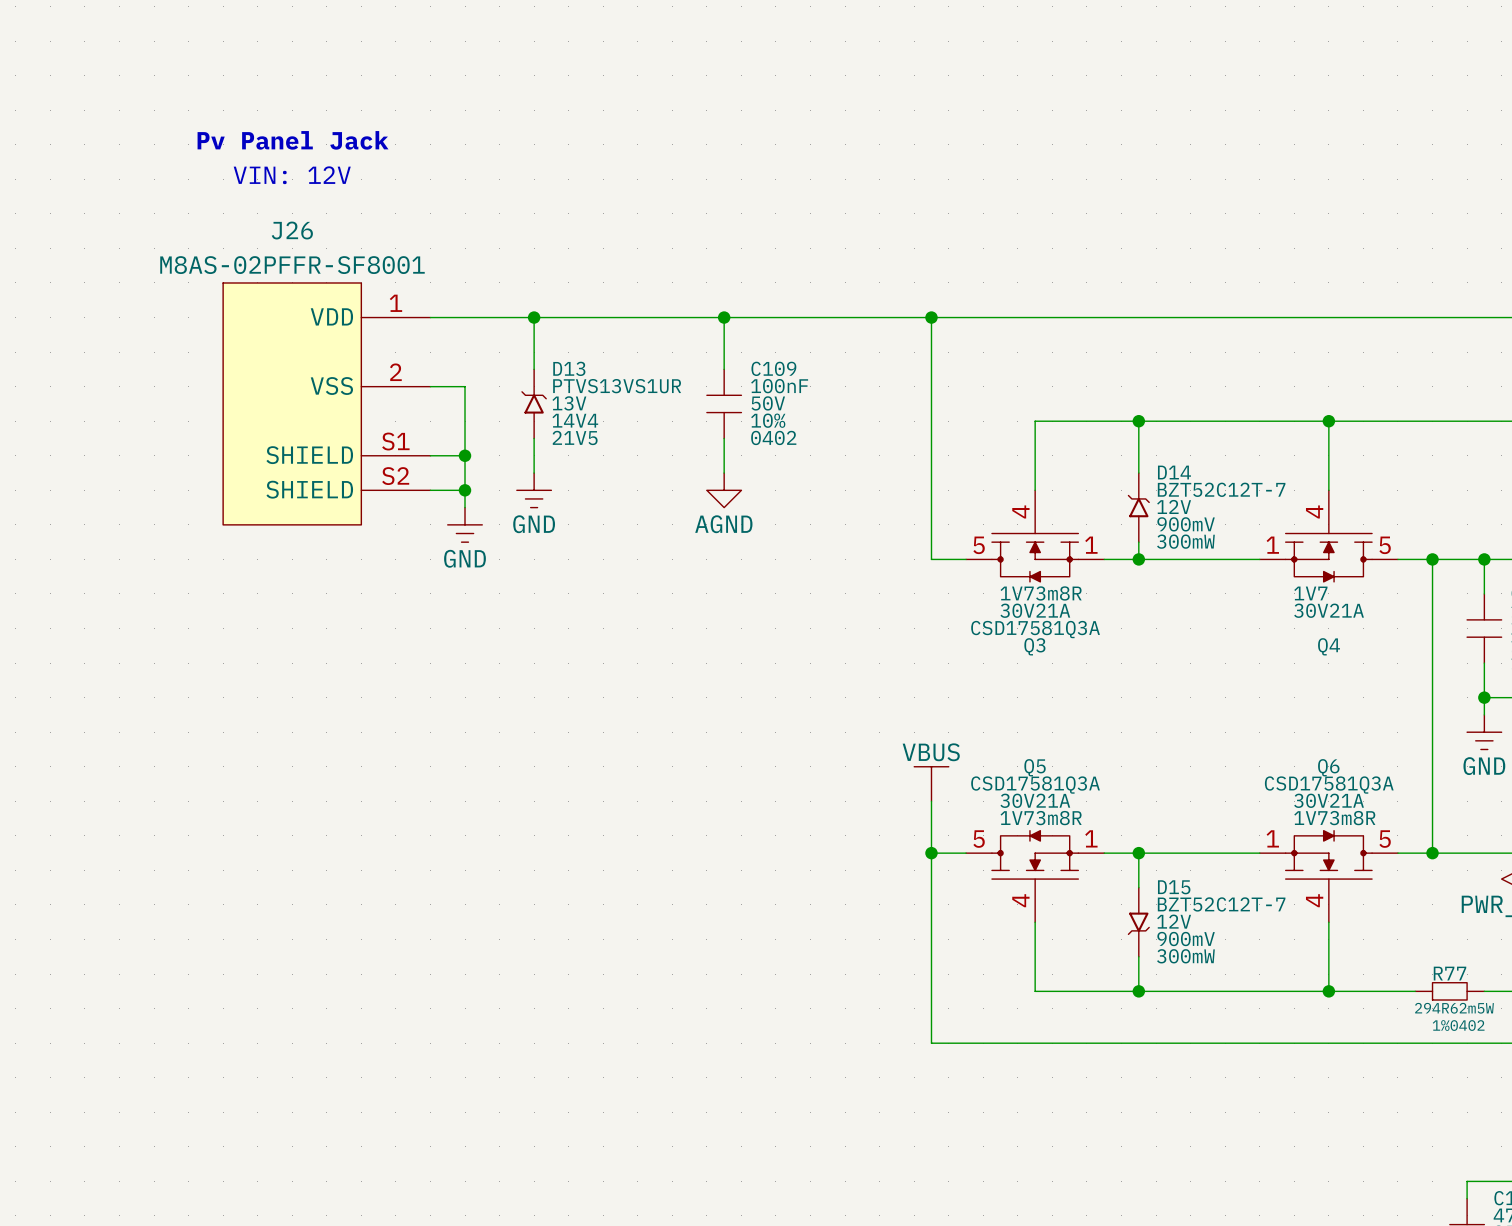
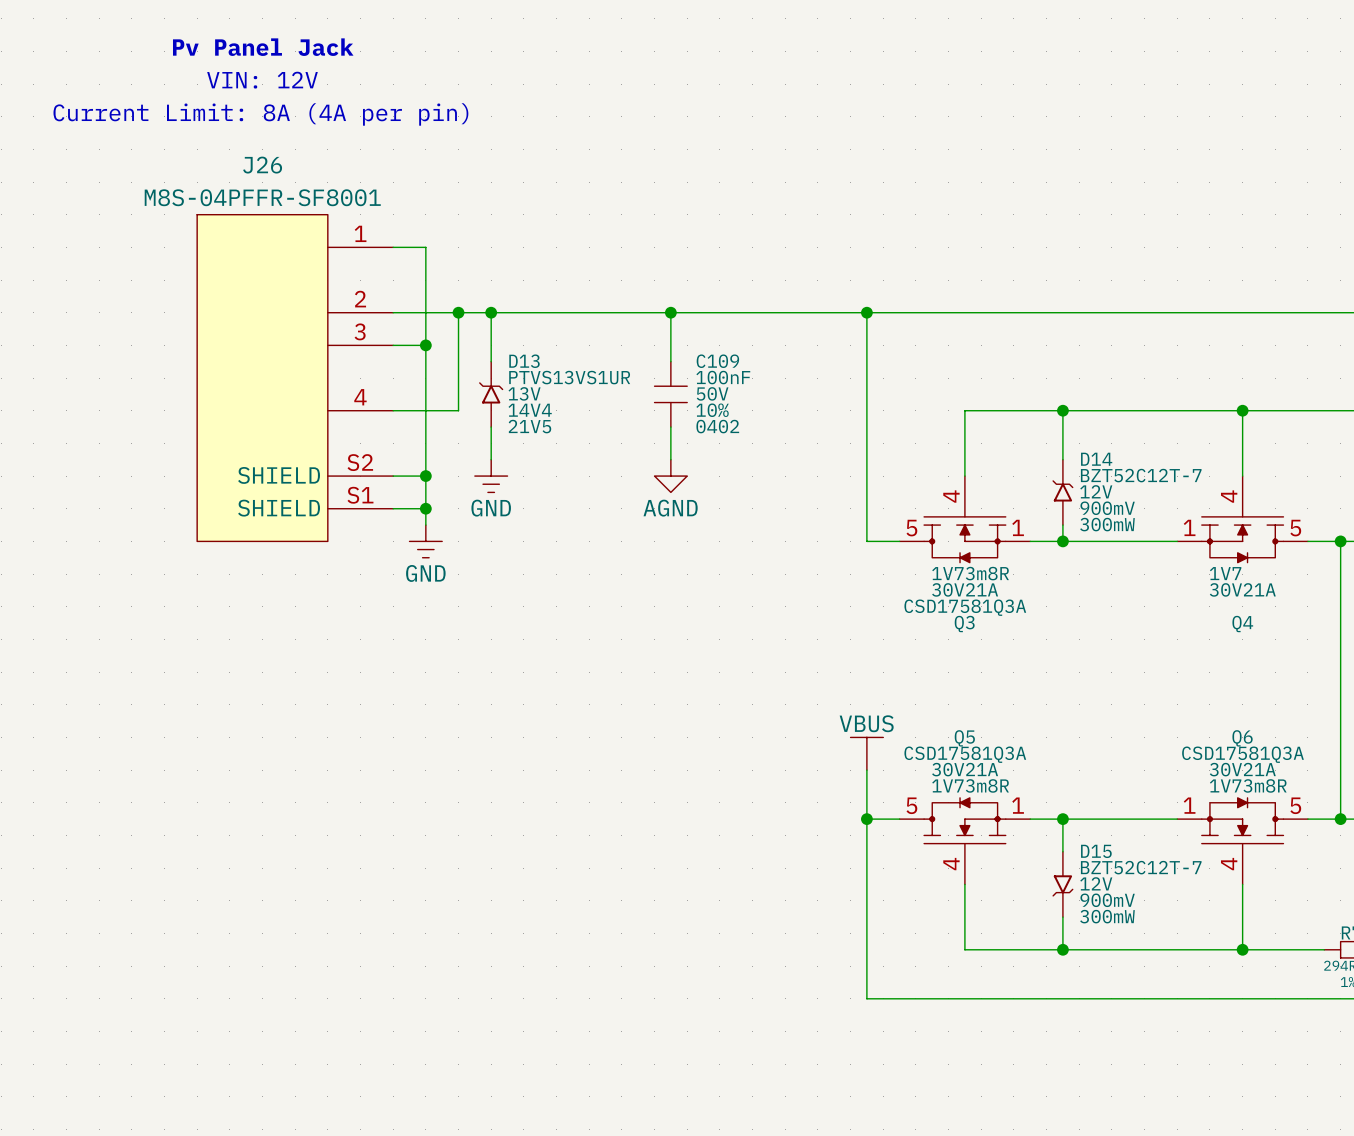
text: none -> Current Limit: 8A (4A per pin) (260, 114)
text position: Pv Panel Jack (293, 140) -> Pv Panel Jack (263, 47)
text position: VIN: 12V (292, 175) -> VIN: 12V (262, 80)
J26 name position: J26 (292, 230) -> J26 (262, 165)
J26 value: M8AS-02PFFR-SF8001 (292, 265) -> M8S-04PFFR-SF8001 (262, 197)
J26 symbol: [223, 282, 431, 525] -> [197, 214, 394, 542]
wire: none -> (458, 312) (458, 410) (393, 410)
junction: none -> (458, 312)
wire: none -> (393, 345) (425, 345)
junction: none -> (425, 345)
wire: (430, 386) (465, 386) -> (393, 247) (425, 247) (425, 378)
wire: (430, 455) (465, 455) -> (393, 508) (425, 508)
junction: (465, 455) -> none
junction: none -> (425, 508)
power symbol position: GND (465, 524) -> GND (425, 541)

